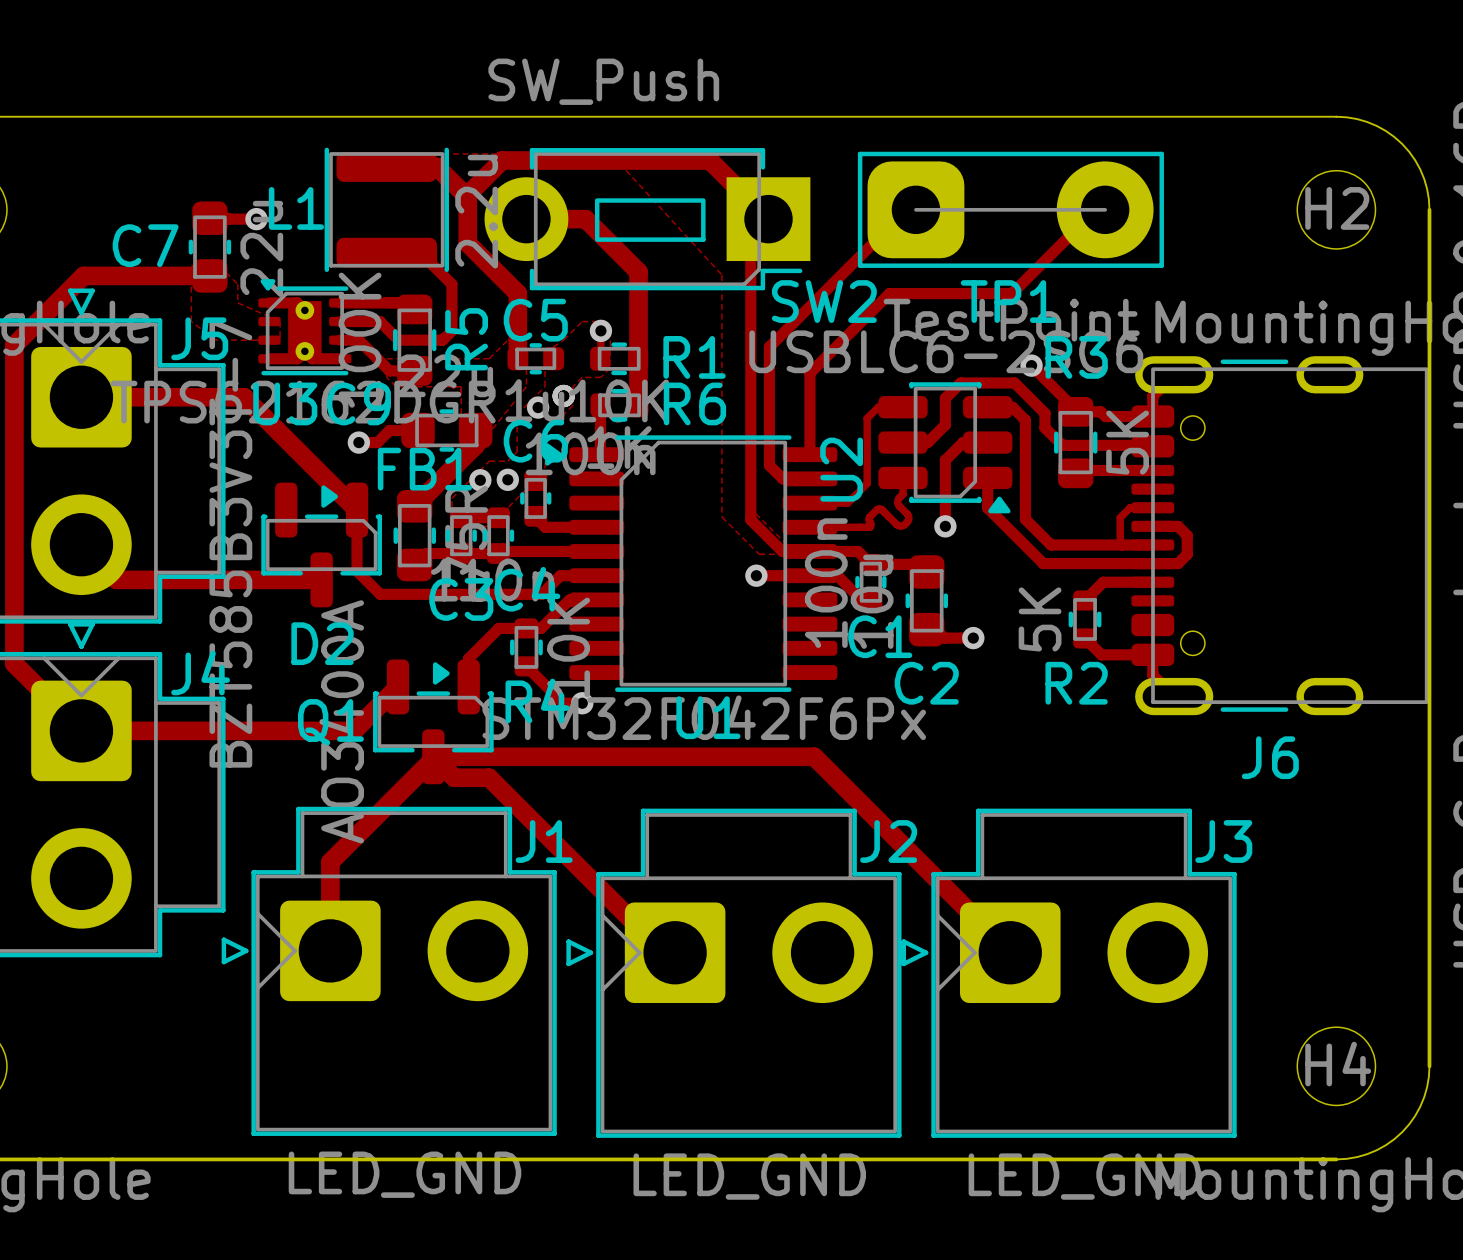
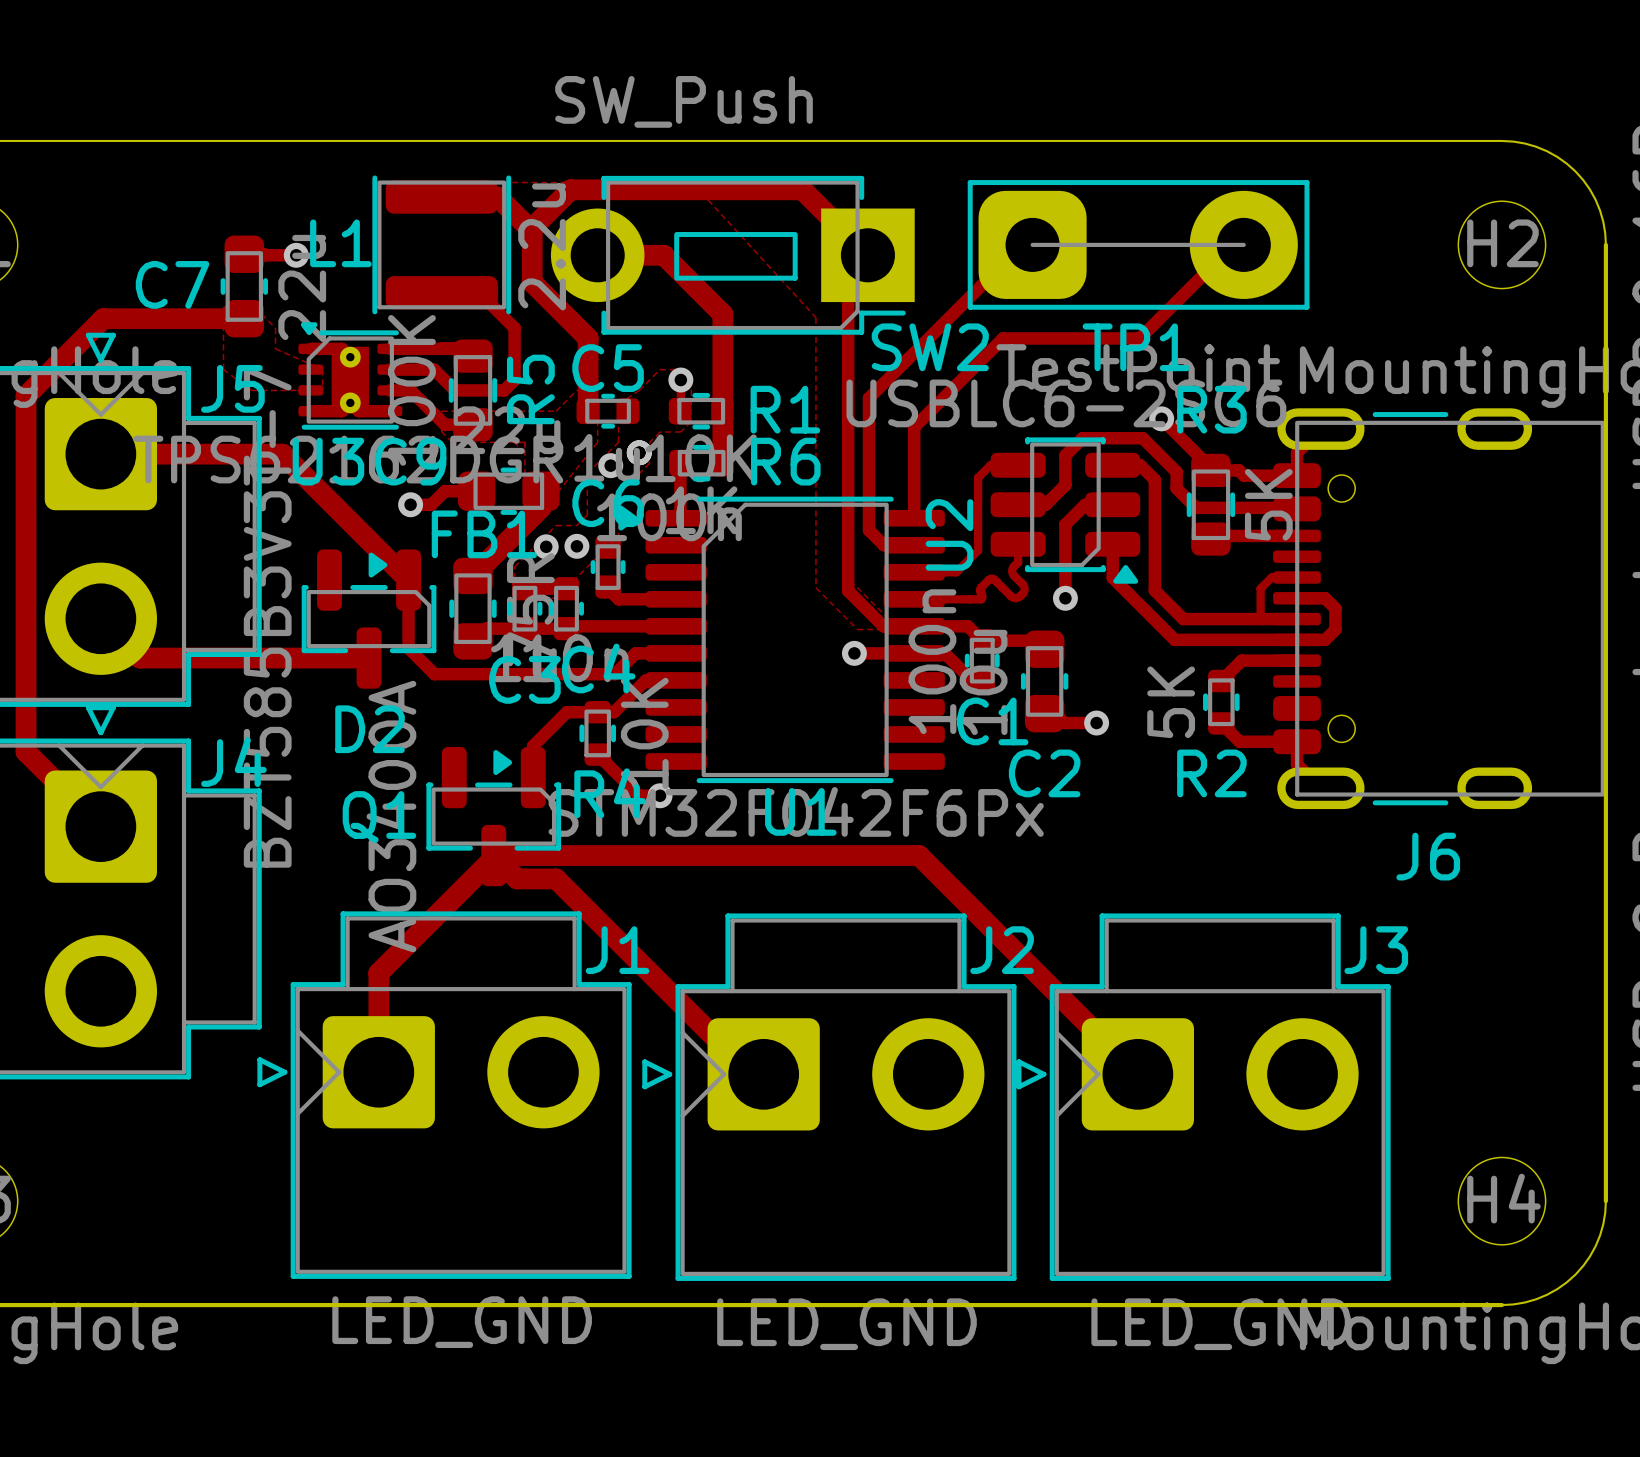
track: (397, 686) (354, 730) (81, 730) -> none

